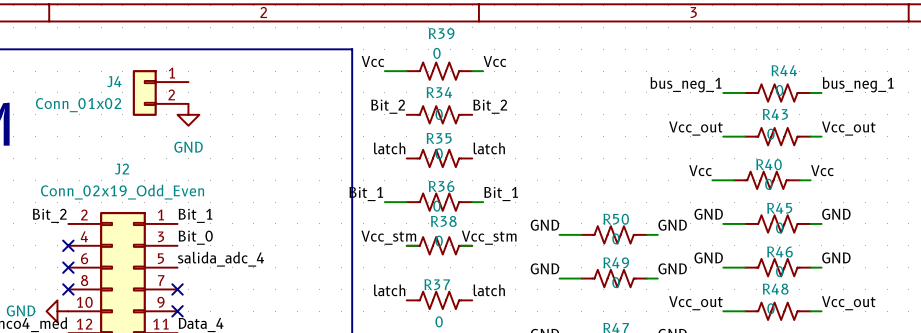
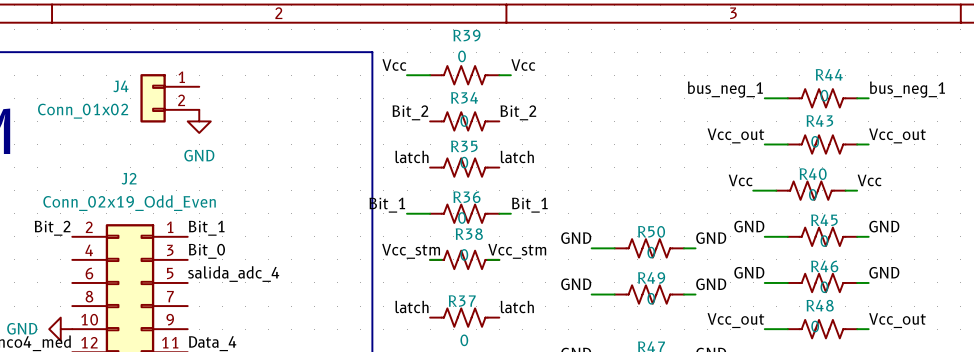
no-connect mark: (68, 245) -> none
no-connect mark: (68, 267) -> none
no-connect mark: (68, 289) -> none
no-connect mark: (177, 289) -> none
no-connect mark: (177, 311) -> none

